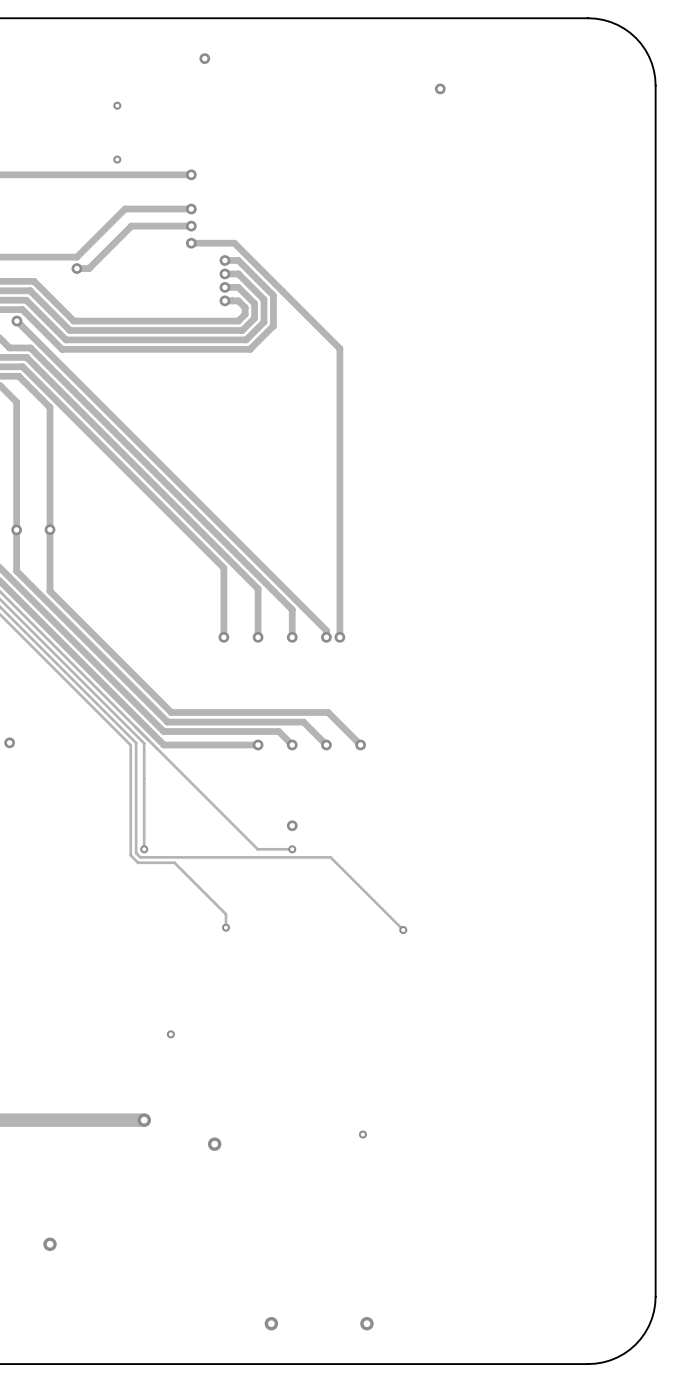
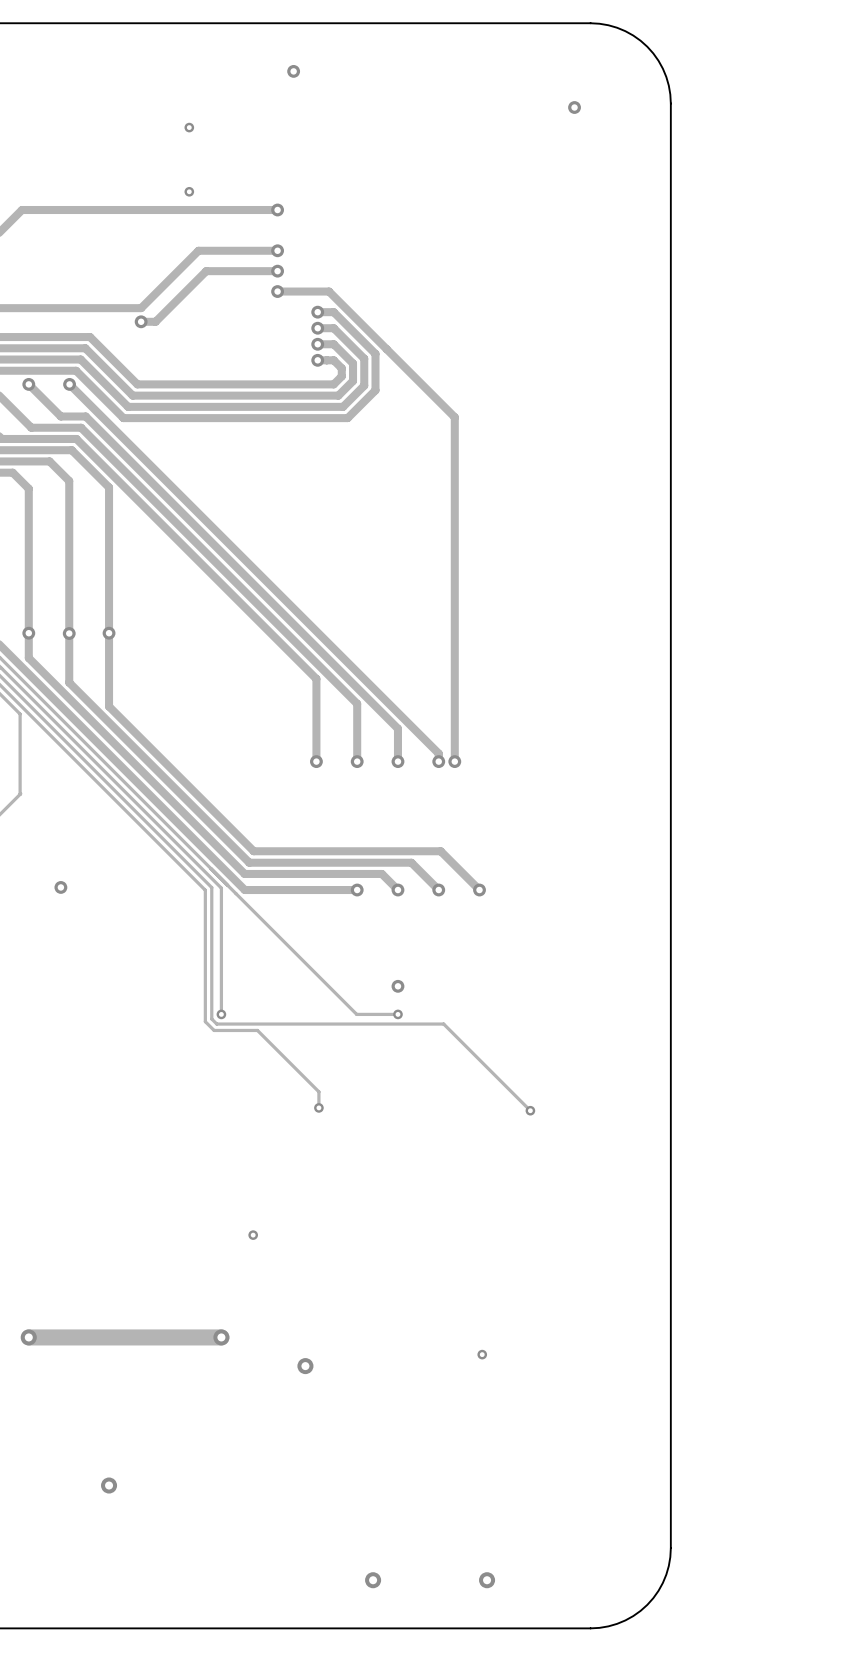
board edge: (453, 18) (588, 18) (610, 22) (630, 32) (640, 43) (651, 63) (655, 85) (655, 1304) (648, 1325) (640, 1338) (630, 1349) (610, 1360) (588, 1364) (453, 1364) -> (590, 23) (608, 25) (625, 31) (647, 46) (662, 68) (668, 85) (670, 103) (670, 1548) (668, 1565) (662, 1582) (647, 1604) (625, 1620) (608, 1626) (590, 1628)

